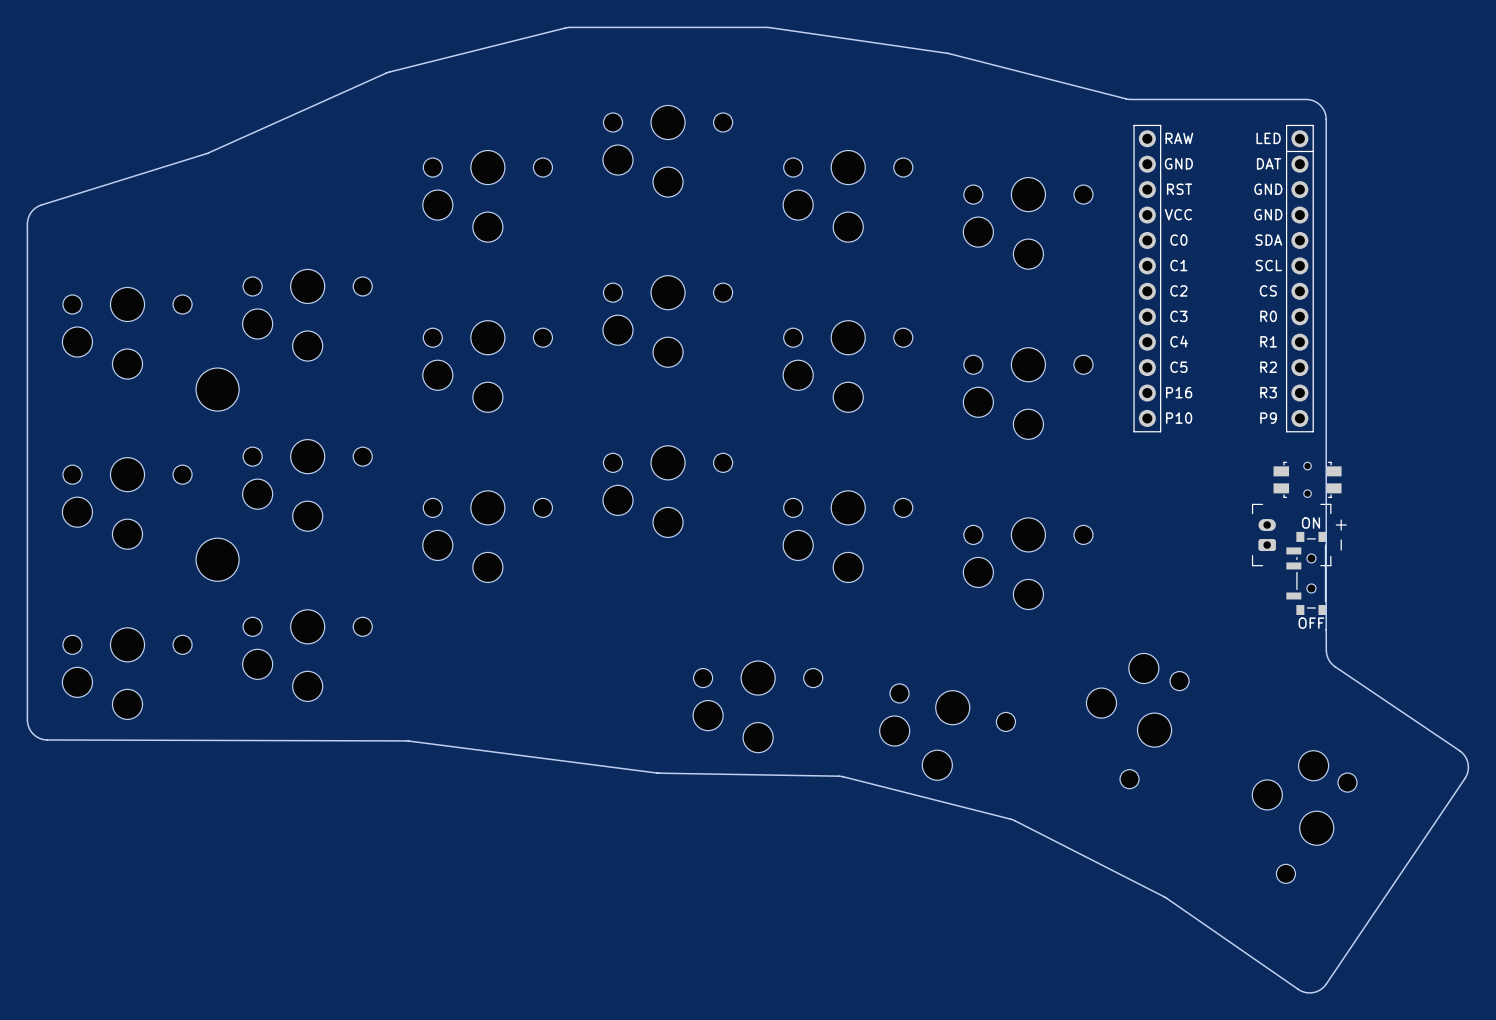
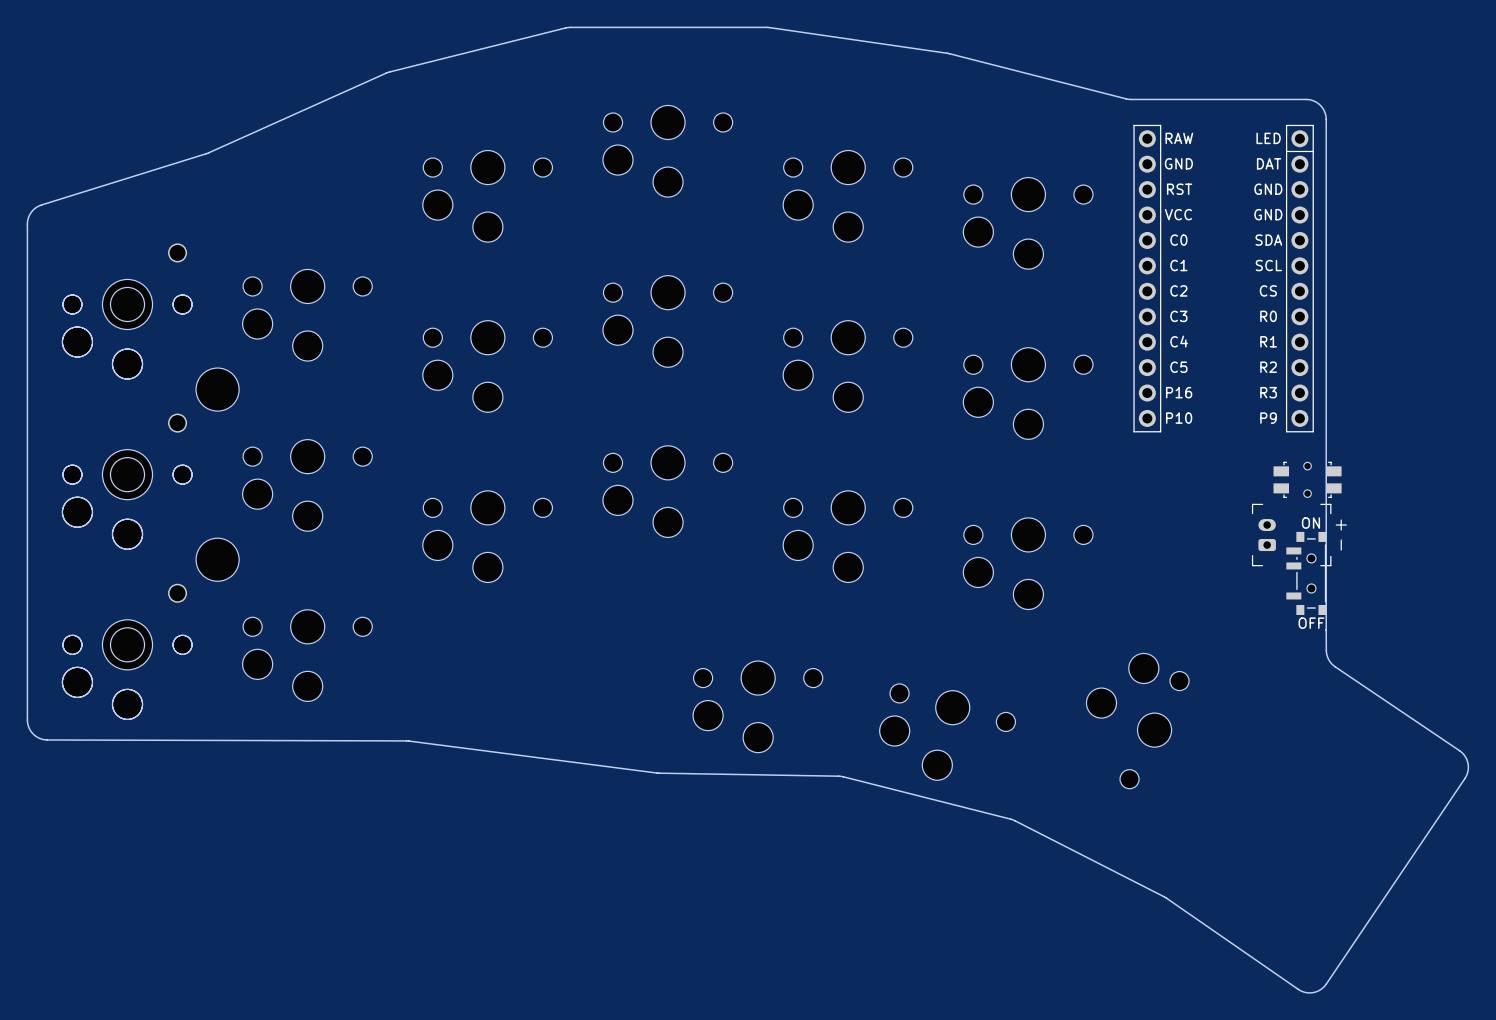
part: none -> (127, 311)
part: none -> (127, 481)
part: none -> (127, 651)
part: (1304, 817) -> none

